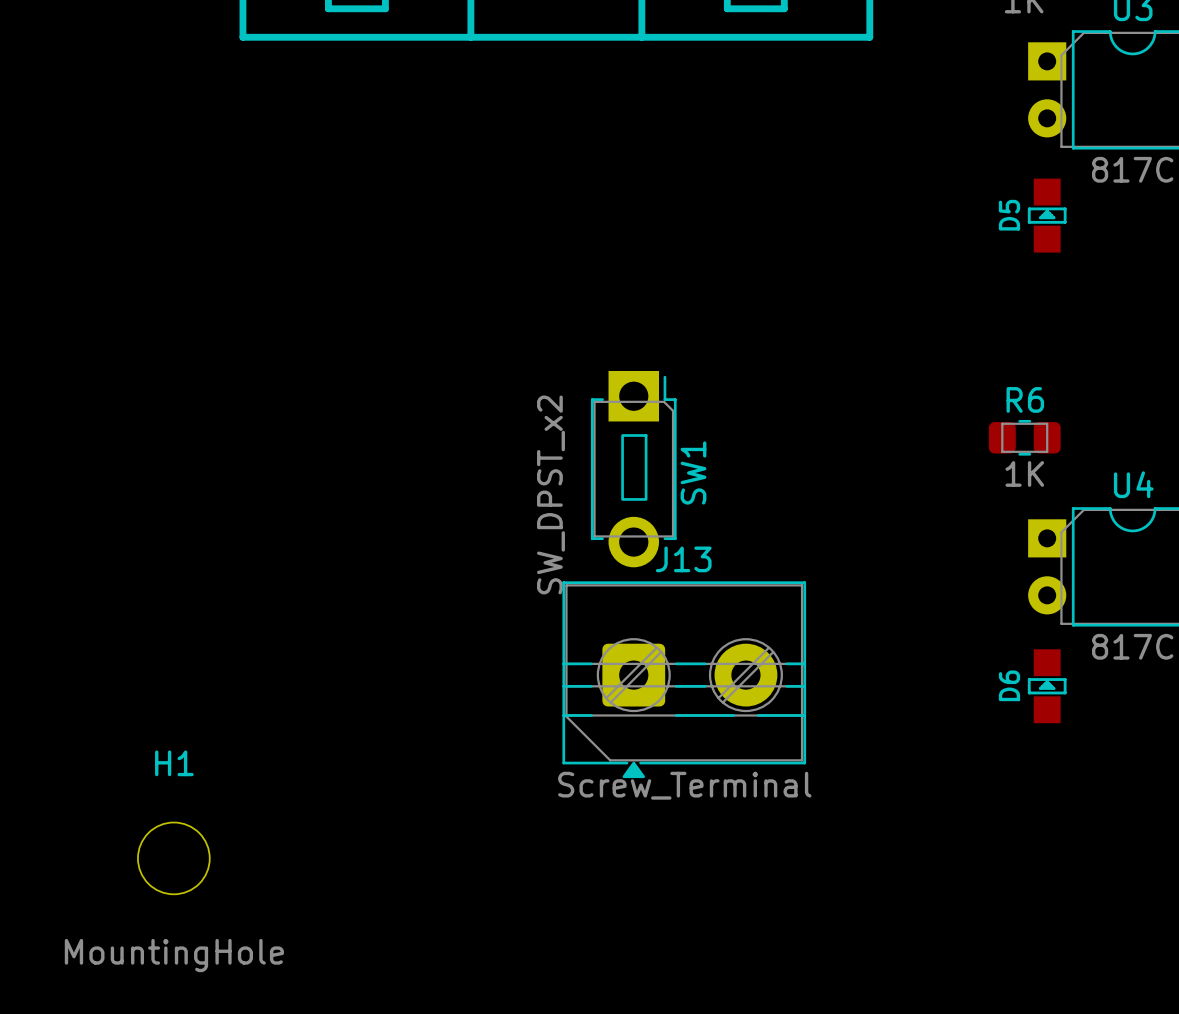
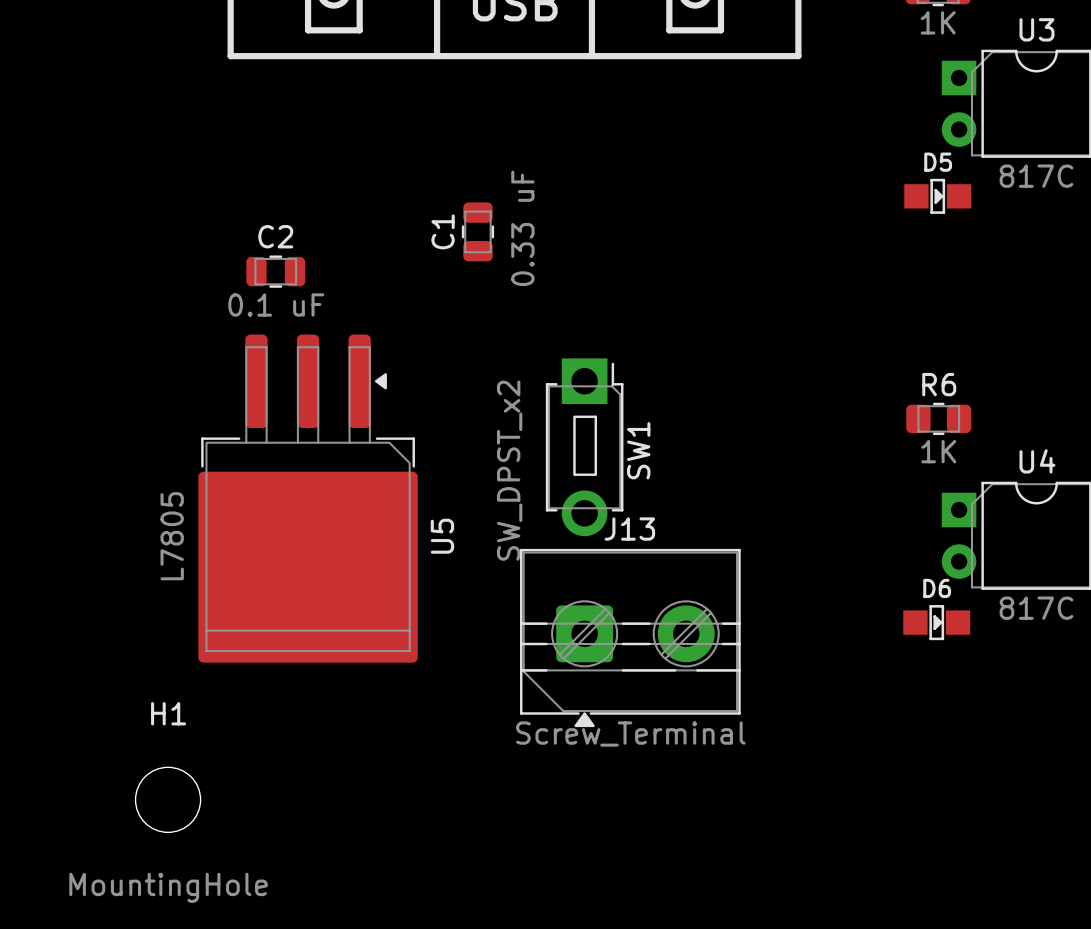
D5 footprint: [1027, 178, 1067, 253] -> [904, 178, 972, 214]
D5 name position: D5 (1009, 215) -> D5 (938, 162)
C1: none -> 0.33 uF (477, 231)
C2: none -> 0.1 uF (275, 271)
U5: none -> L7805 (308, 498)
D6 rotation: 0° (1047, 686) -> 90° clockwise (936, 622)

